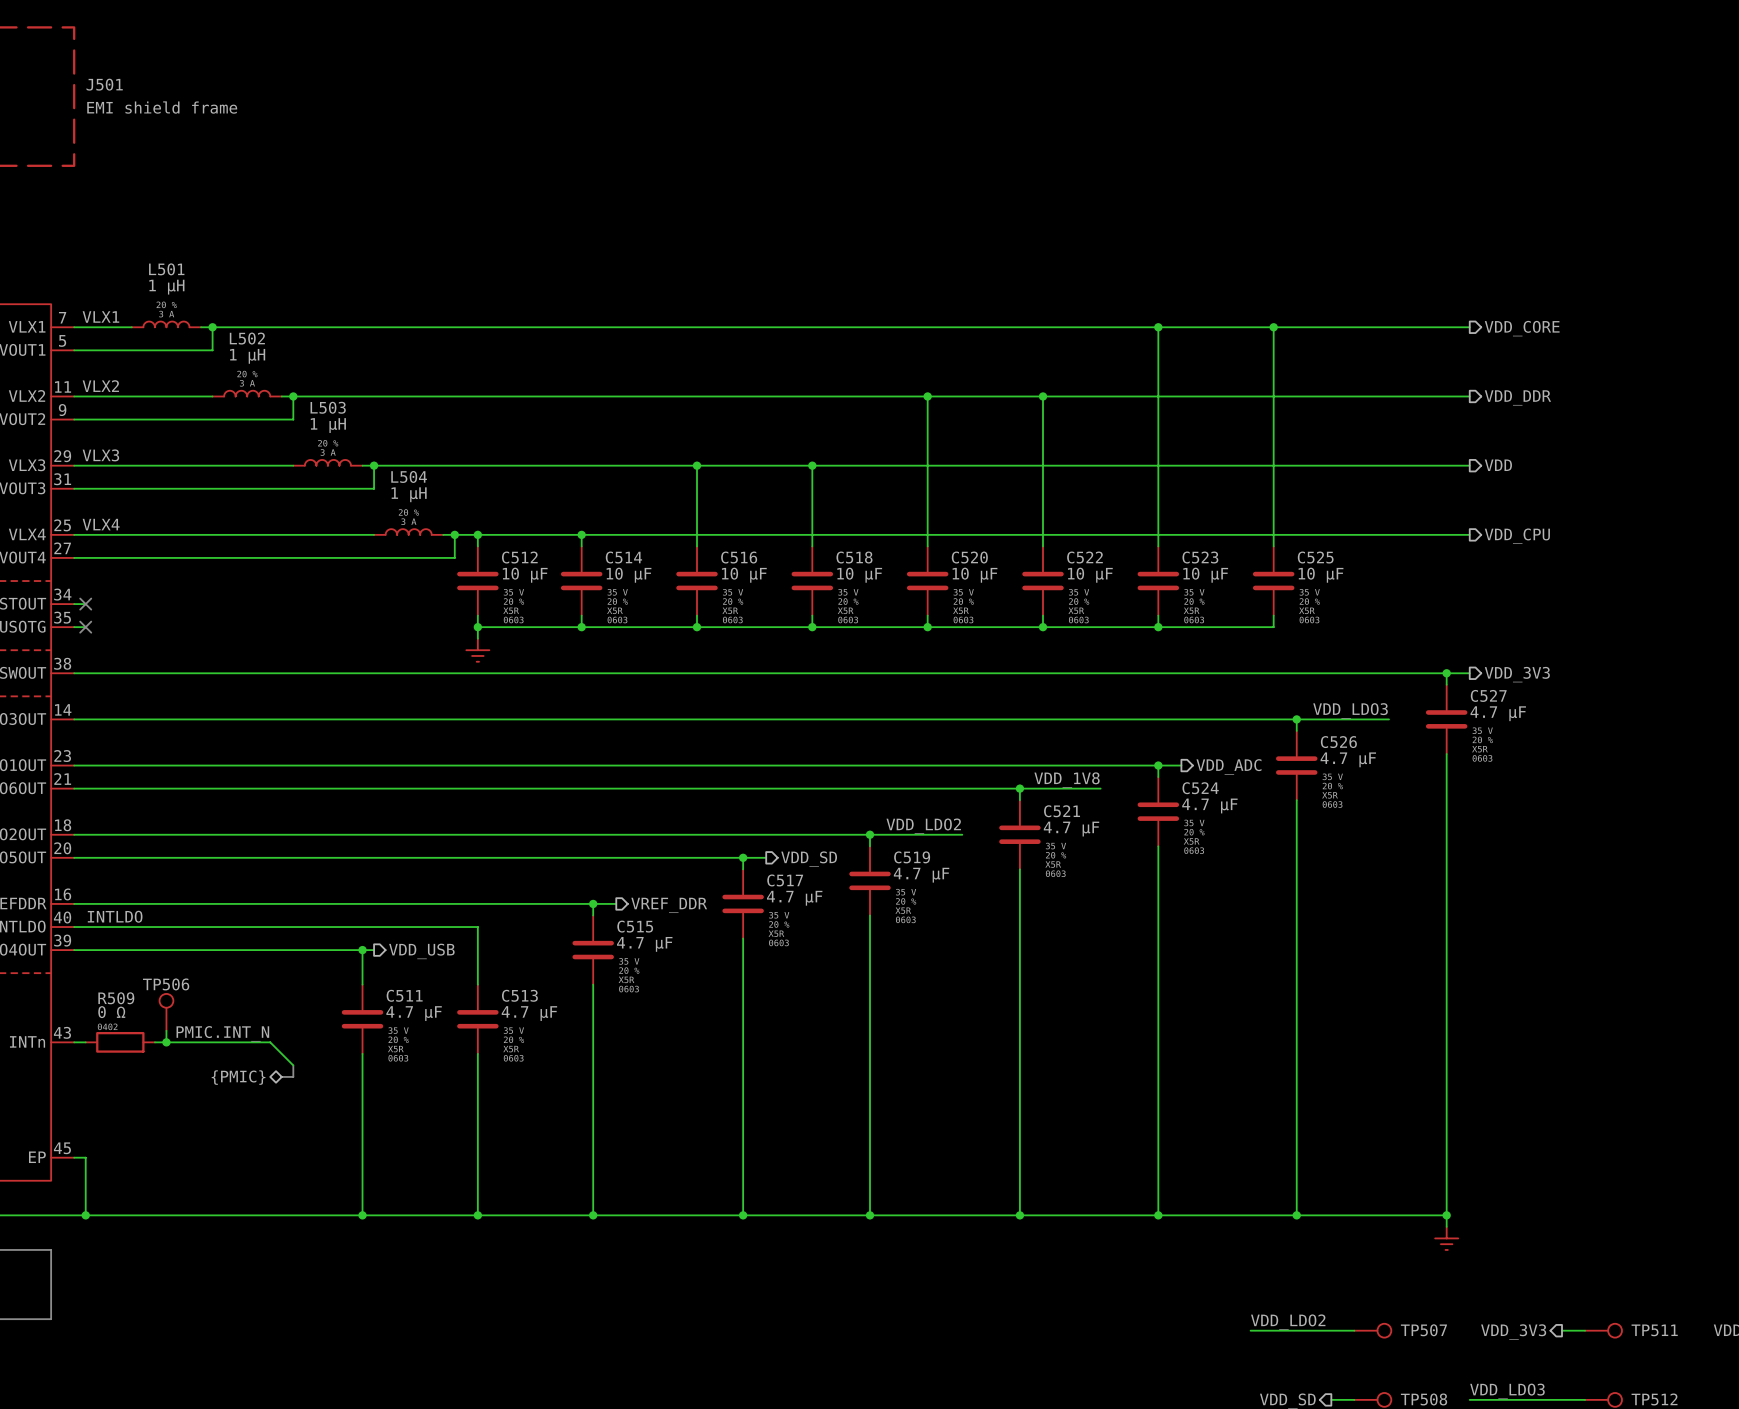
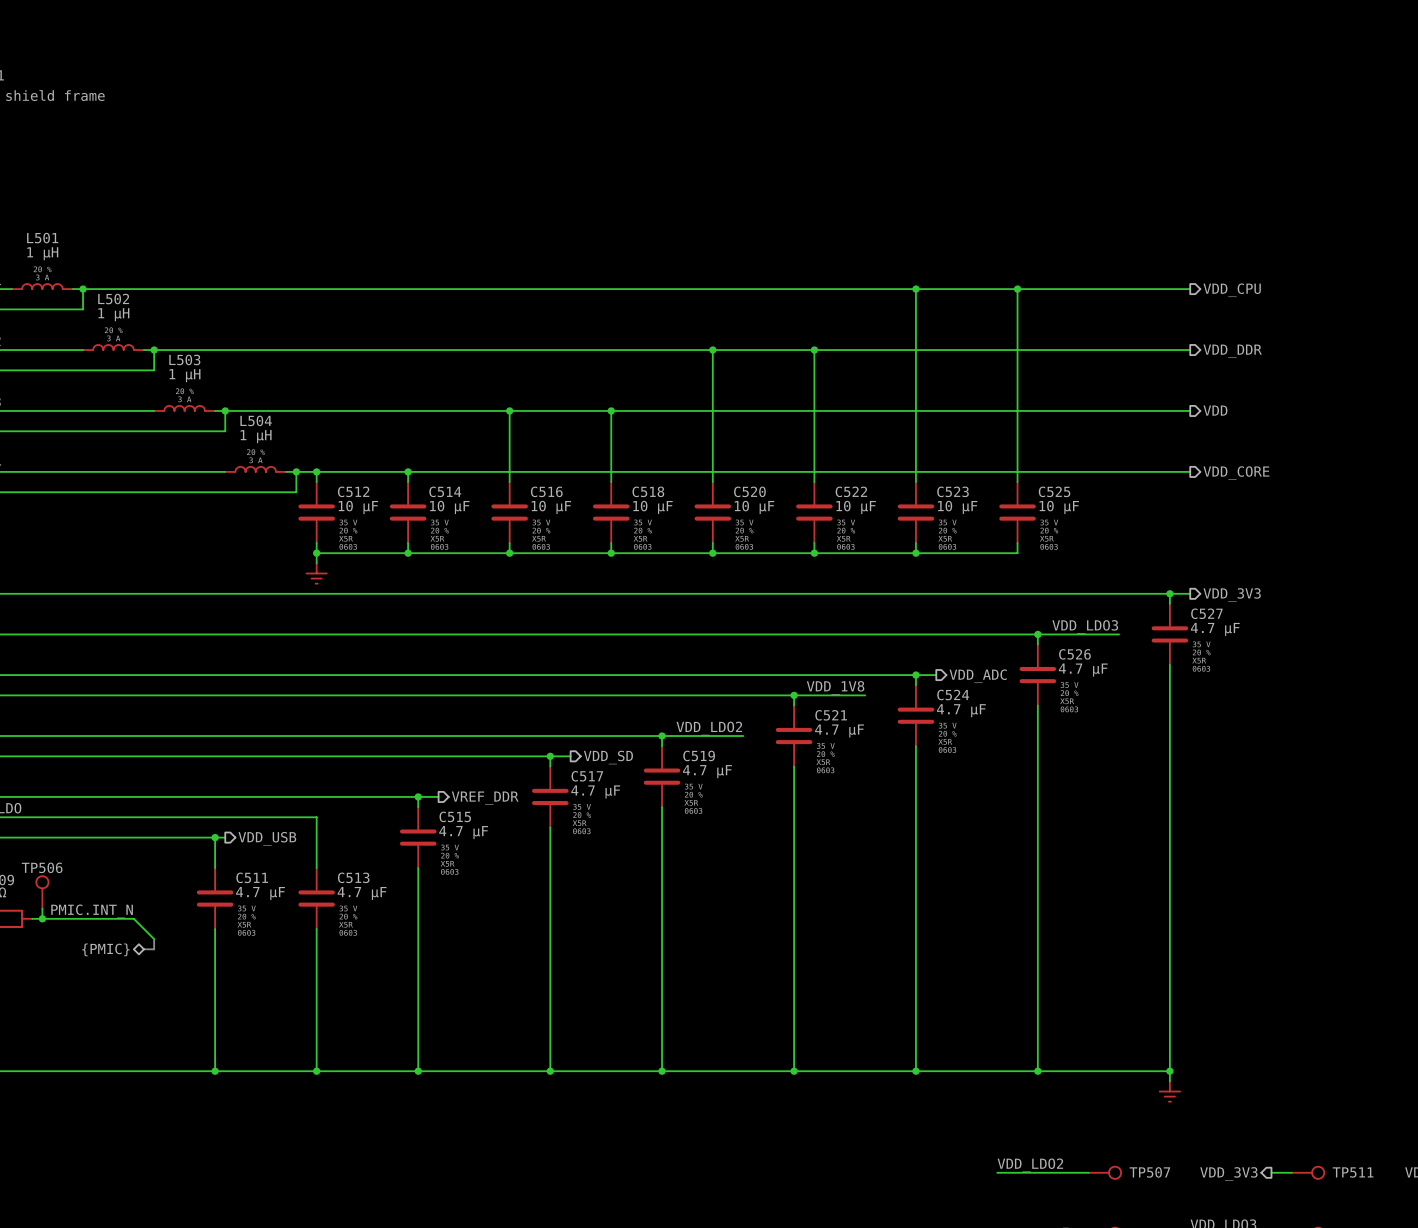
hierarchical label: VDD_CORE (1522, 328) -> VDD_CPU (1232, 290)
hierarchical label: VDD_CPU (1517, 536) -> VDD_CORE (1236, 473)

